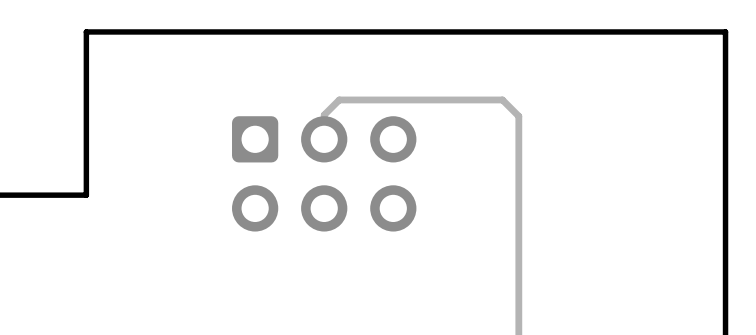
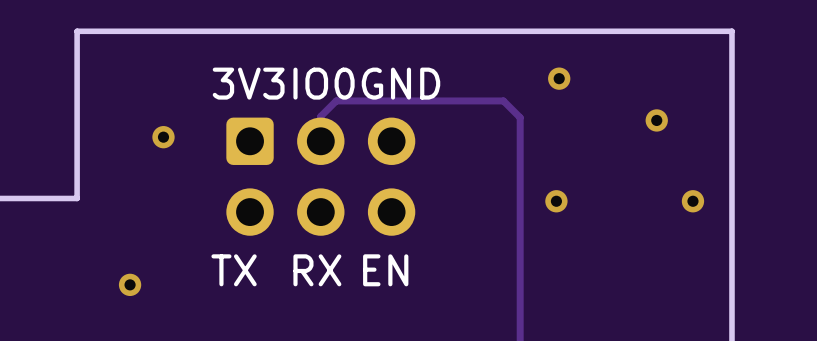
via: none -> (559, 78)
text: none -> 3V3 (248, 83)
text: none -> IO0 (324, 83)
text: none -> GND (400, 83)
via: none -> (656, 120)
via: none -> (163, 137)
via: none -> (556, 201)
via: none -> (692, 201)
text: none -> TX (234, 270)
text: none -> RX (317, 270)
text: none -> EN (385, 270)
via: none -> (130, 284)

